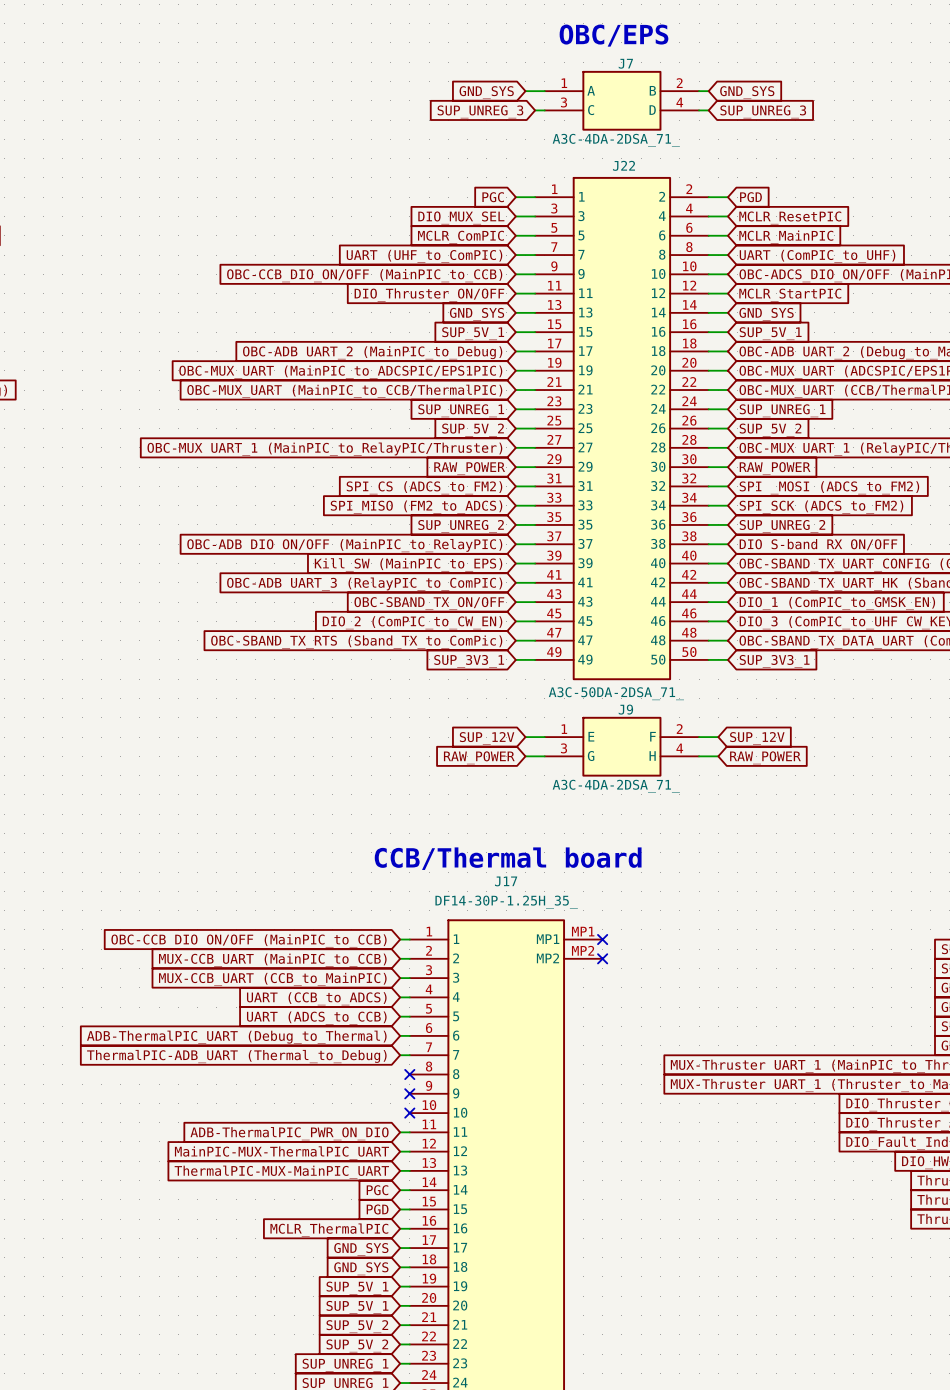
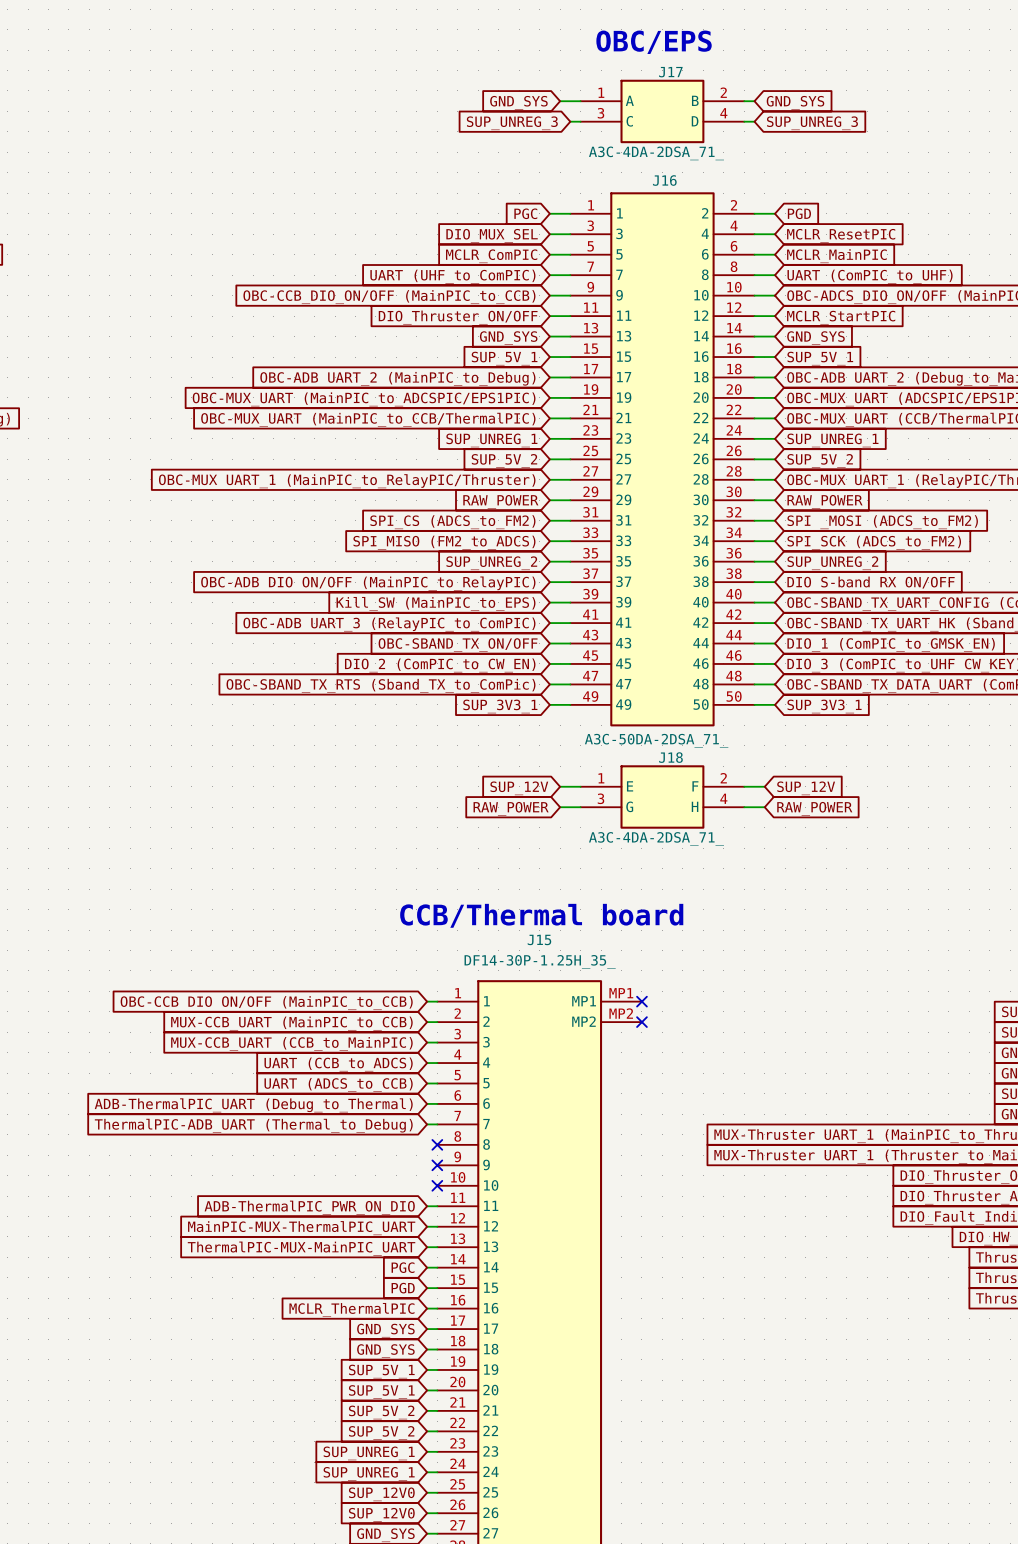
J7 name: J7 (625, 63) -> J17 (670, 72)
J22 name: J22 (623, 165) -> J16 (664, 180)
J9 name: J9 (625, 709) -> J18 (670, 757)
J17 name: J17 (506, 881) -> J15 (539, 939)

